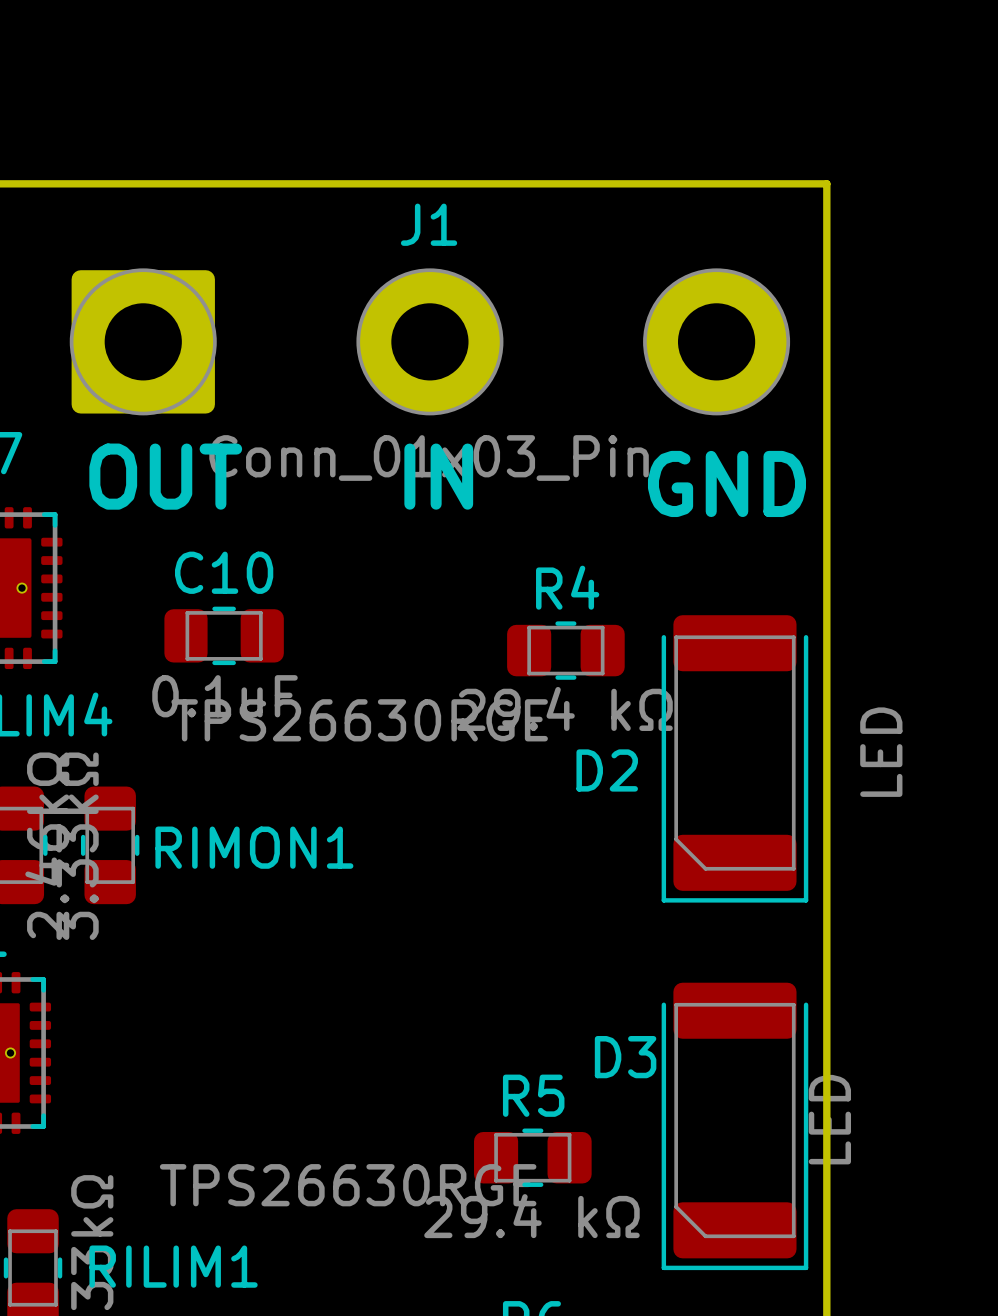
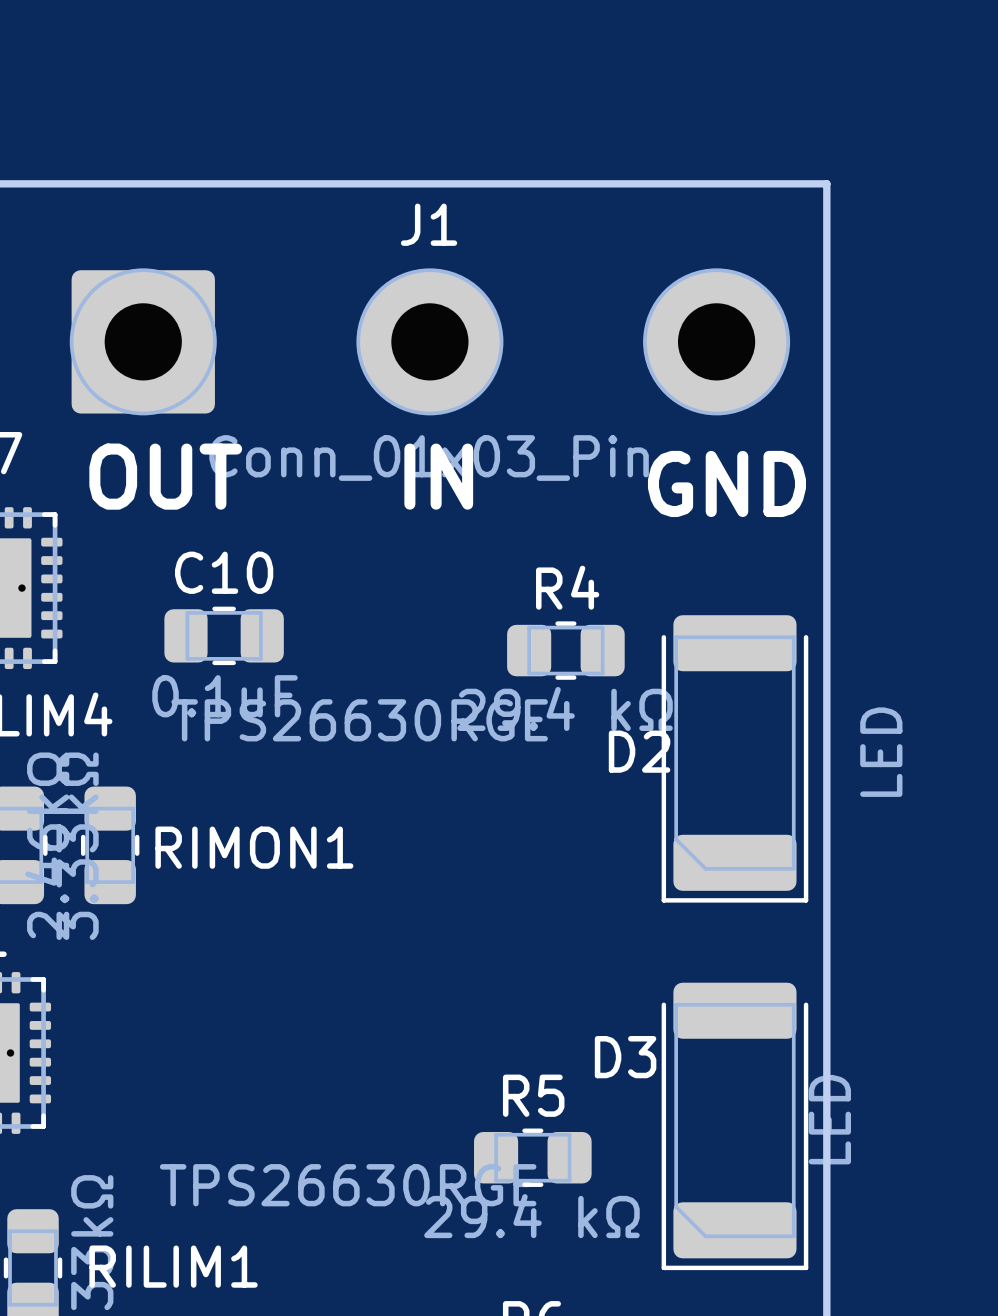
D2 name position: D2 (607, 770) -> D2 (639, 751)

